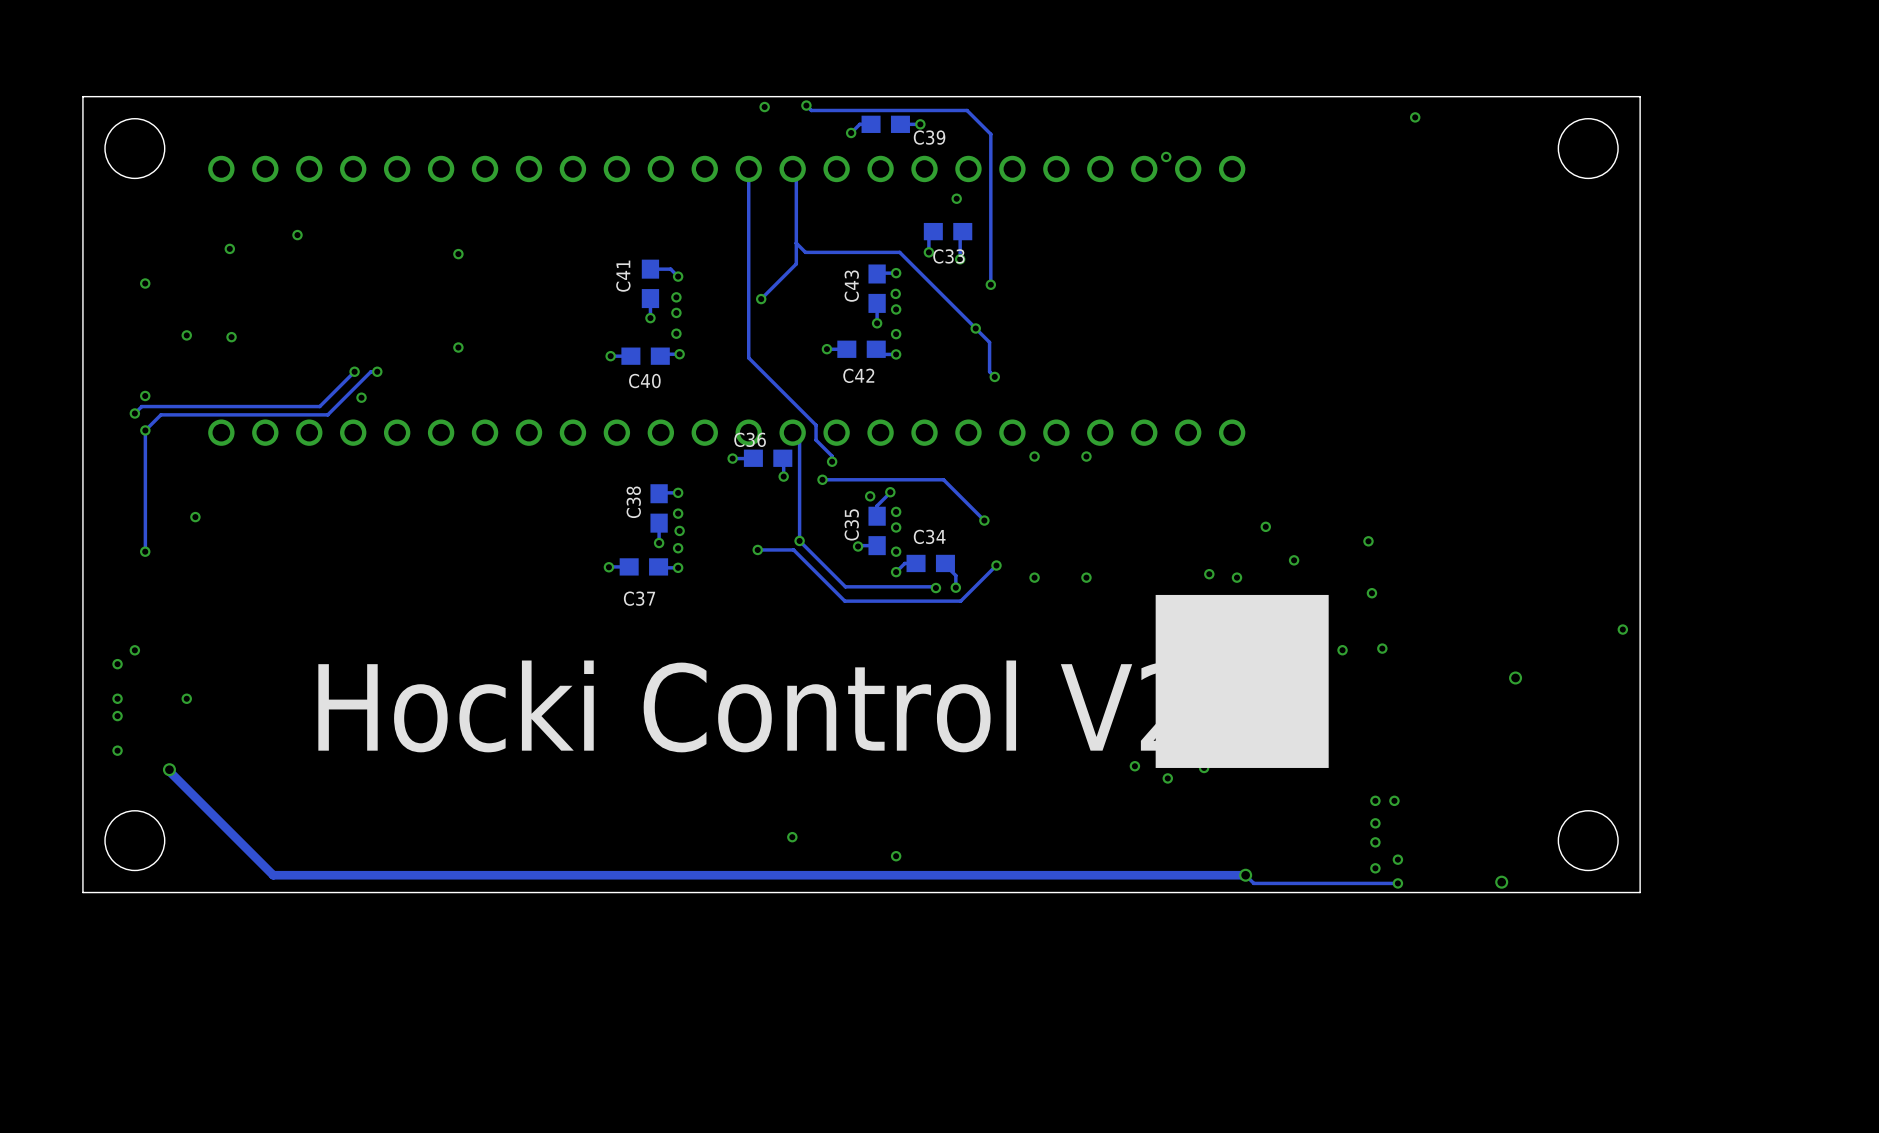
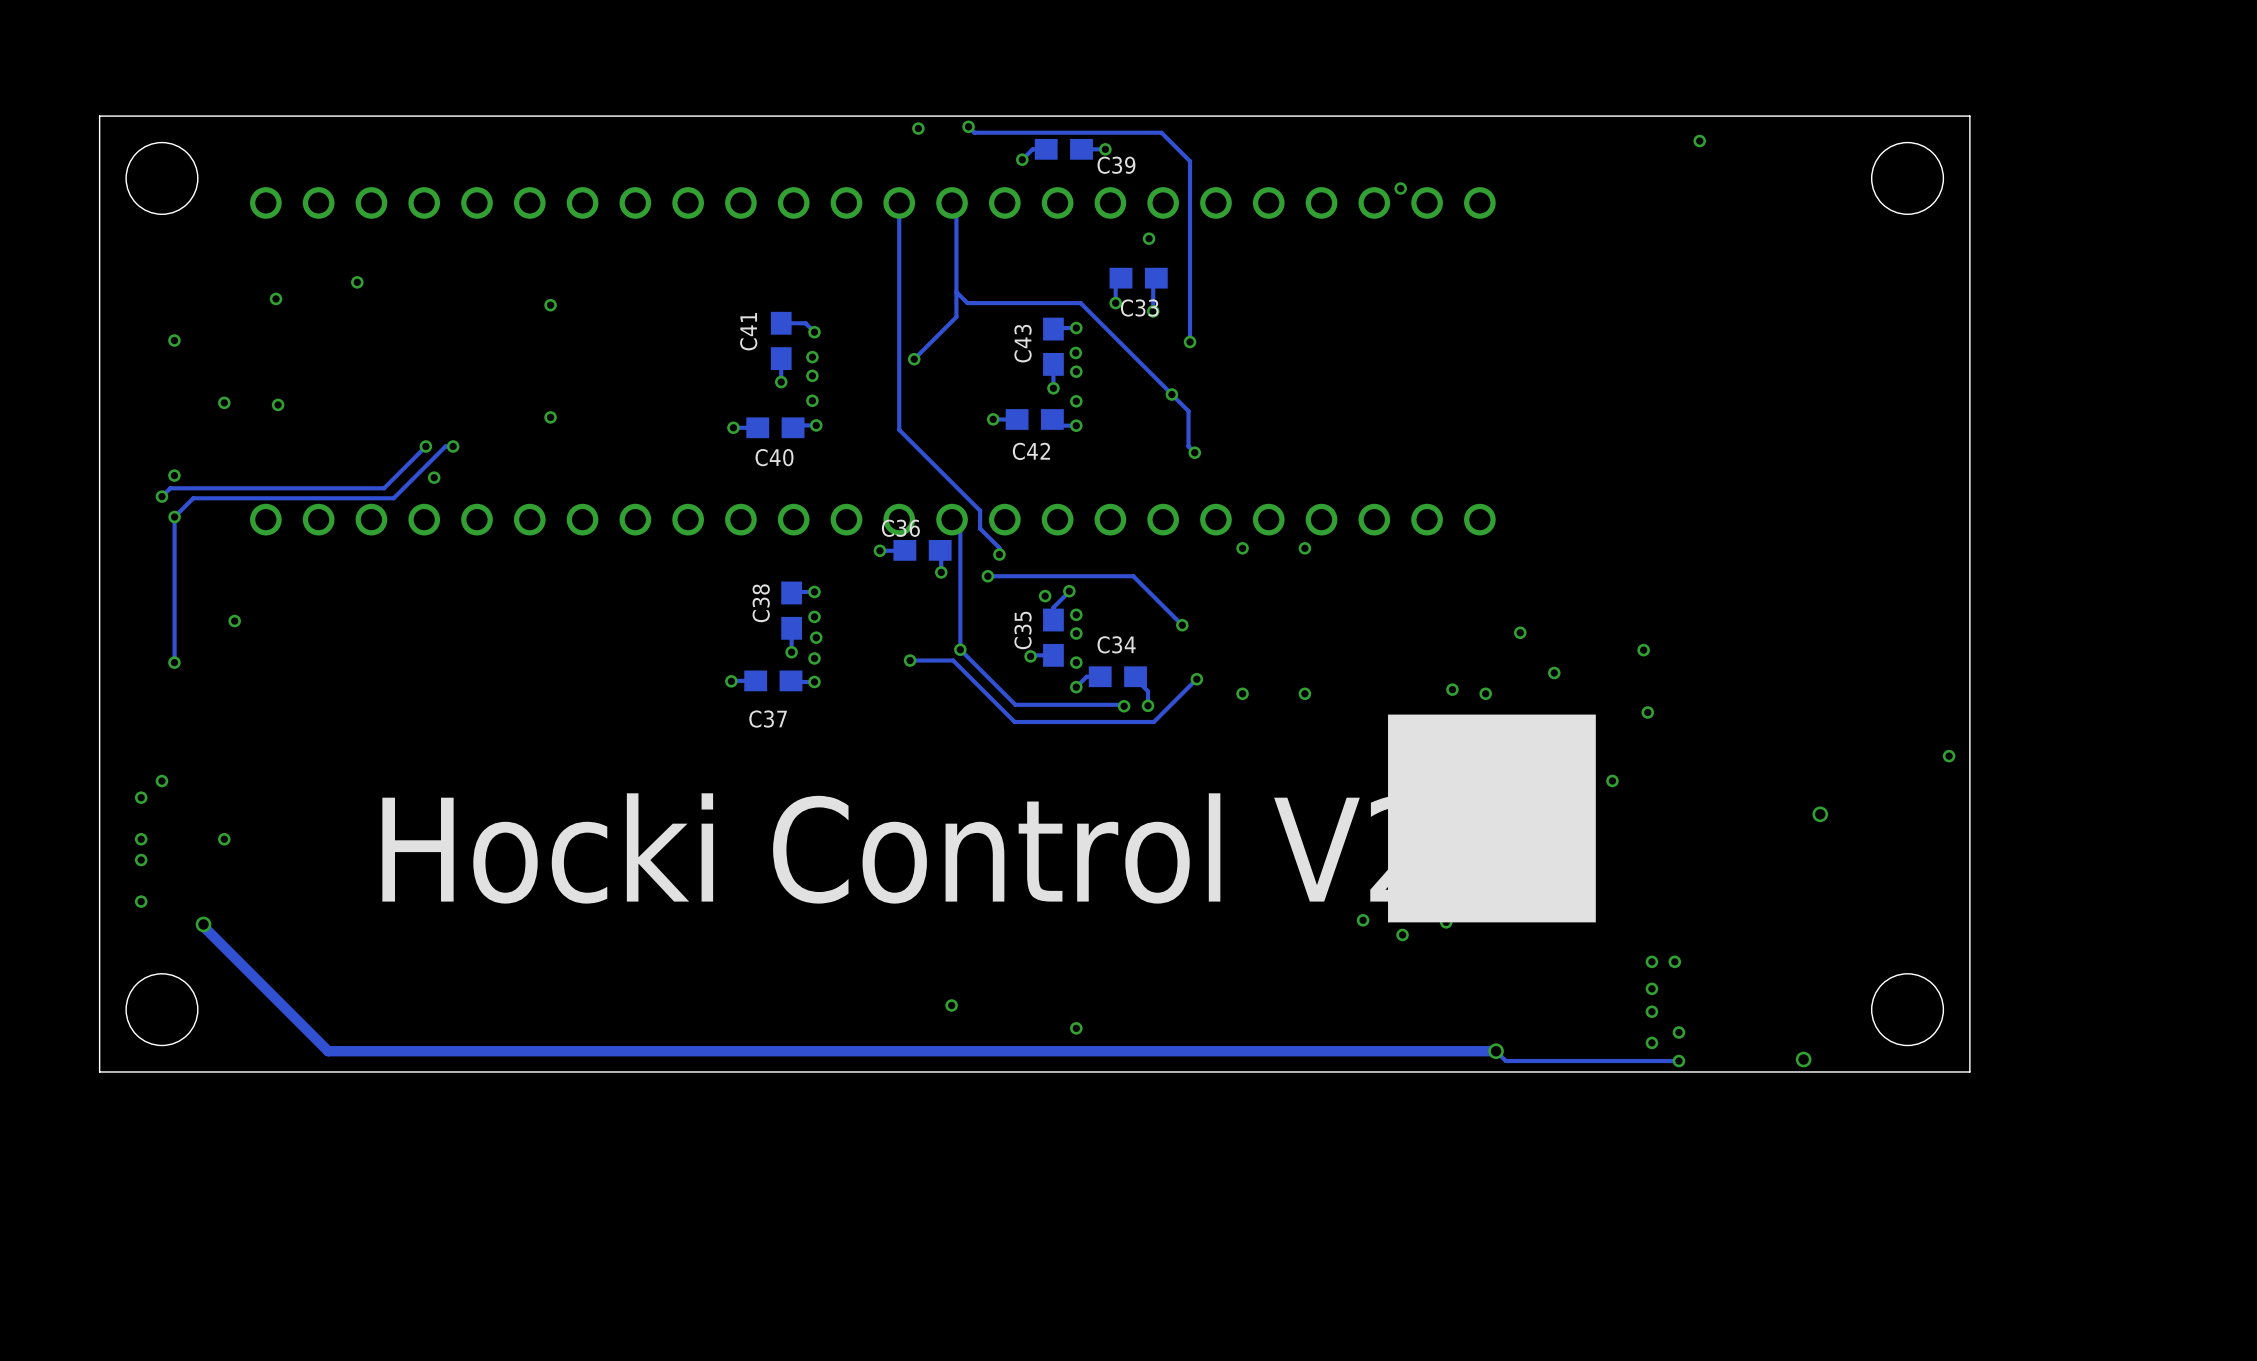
via: (1382, 648) -> none

